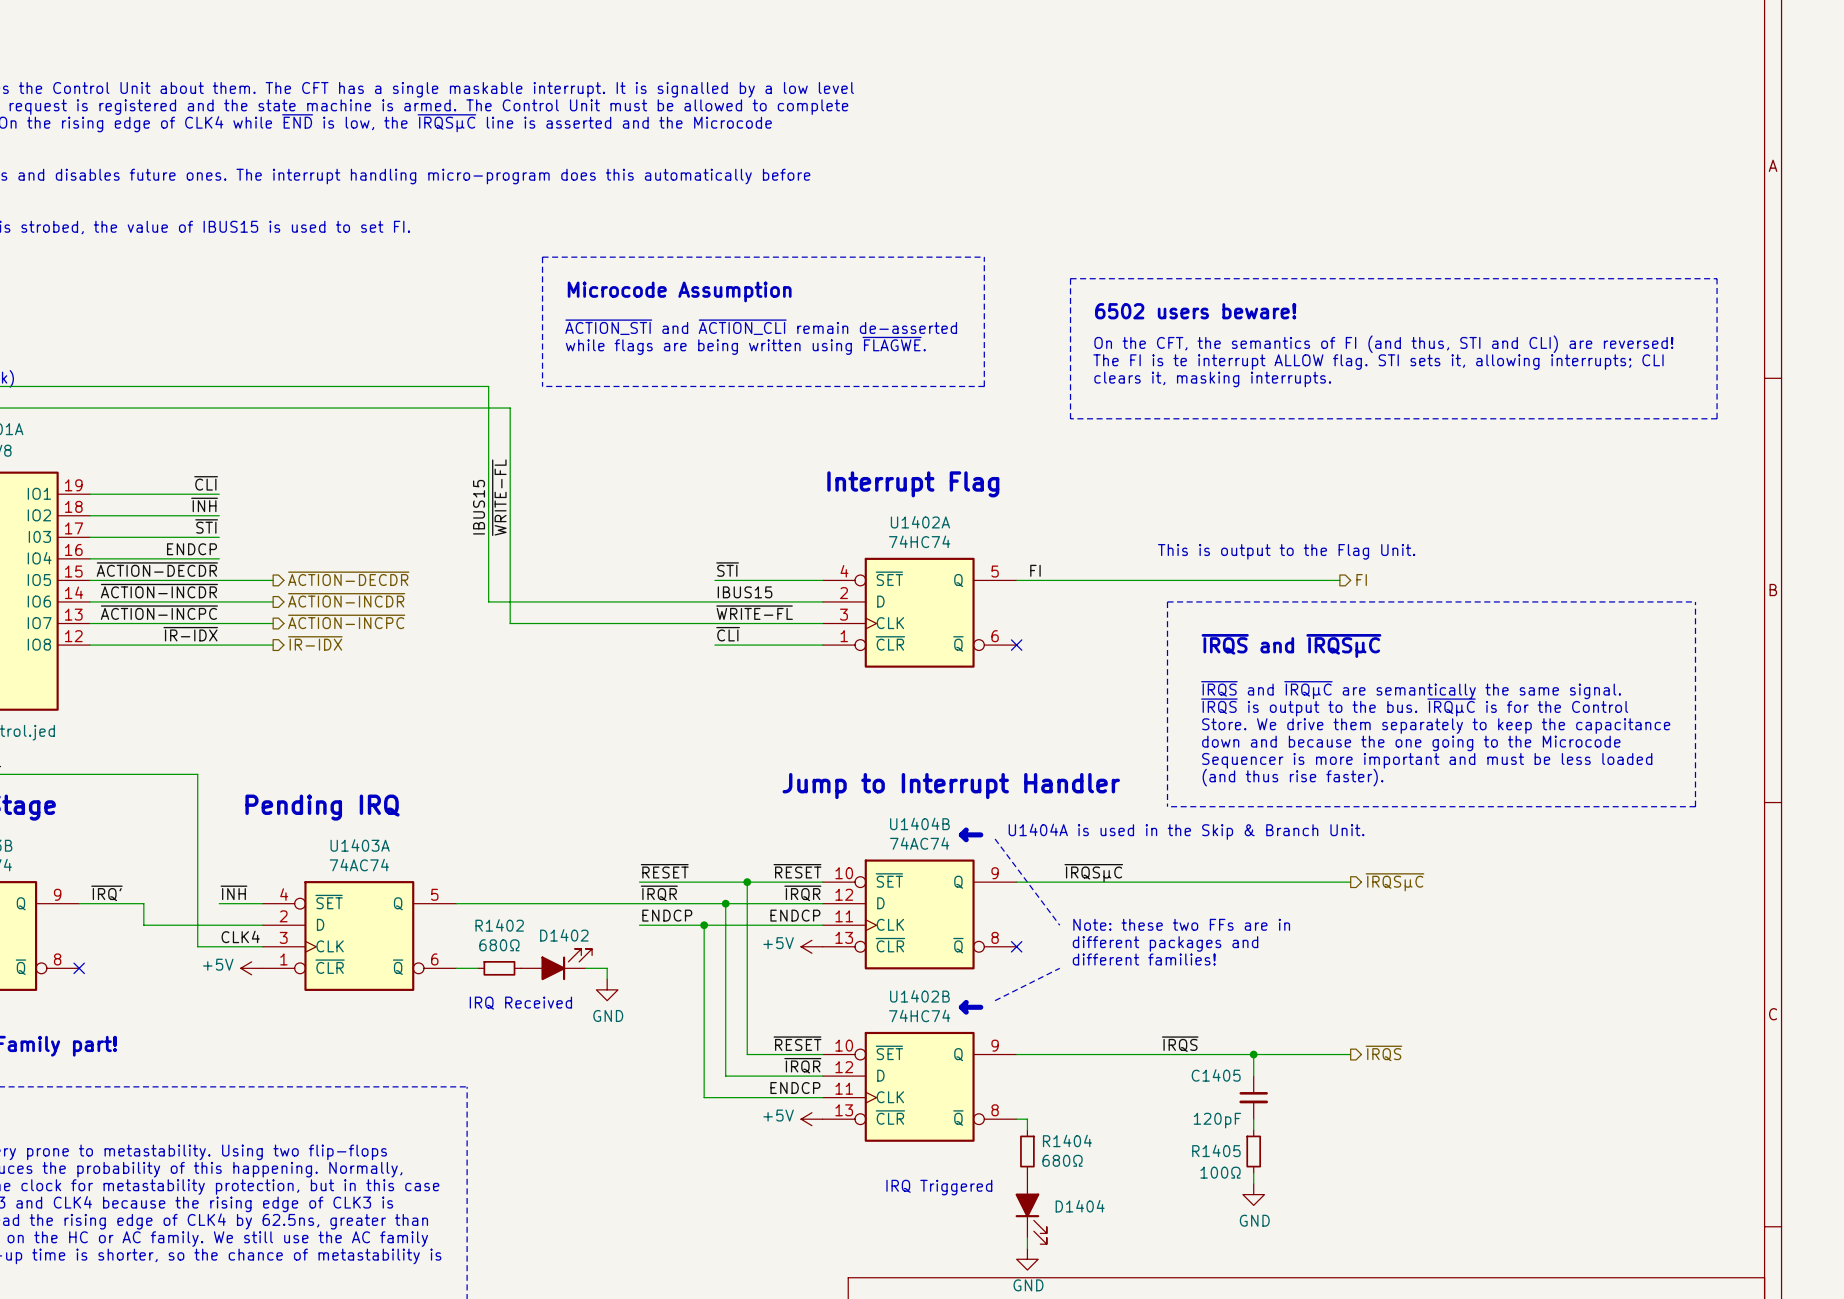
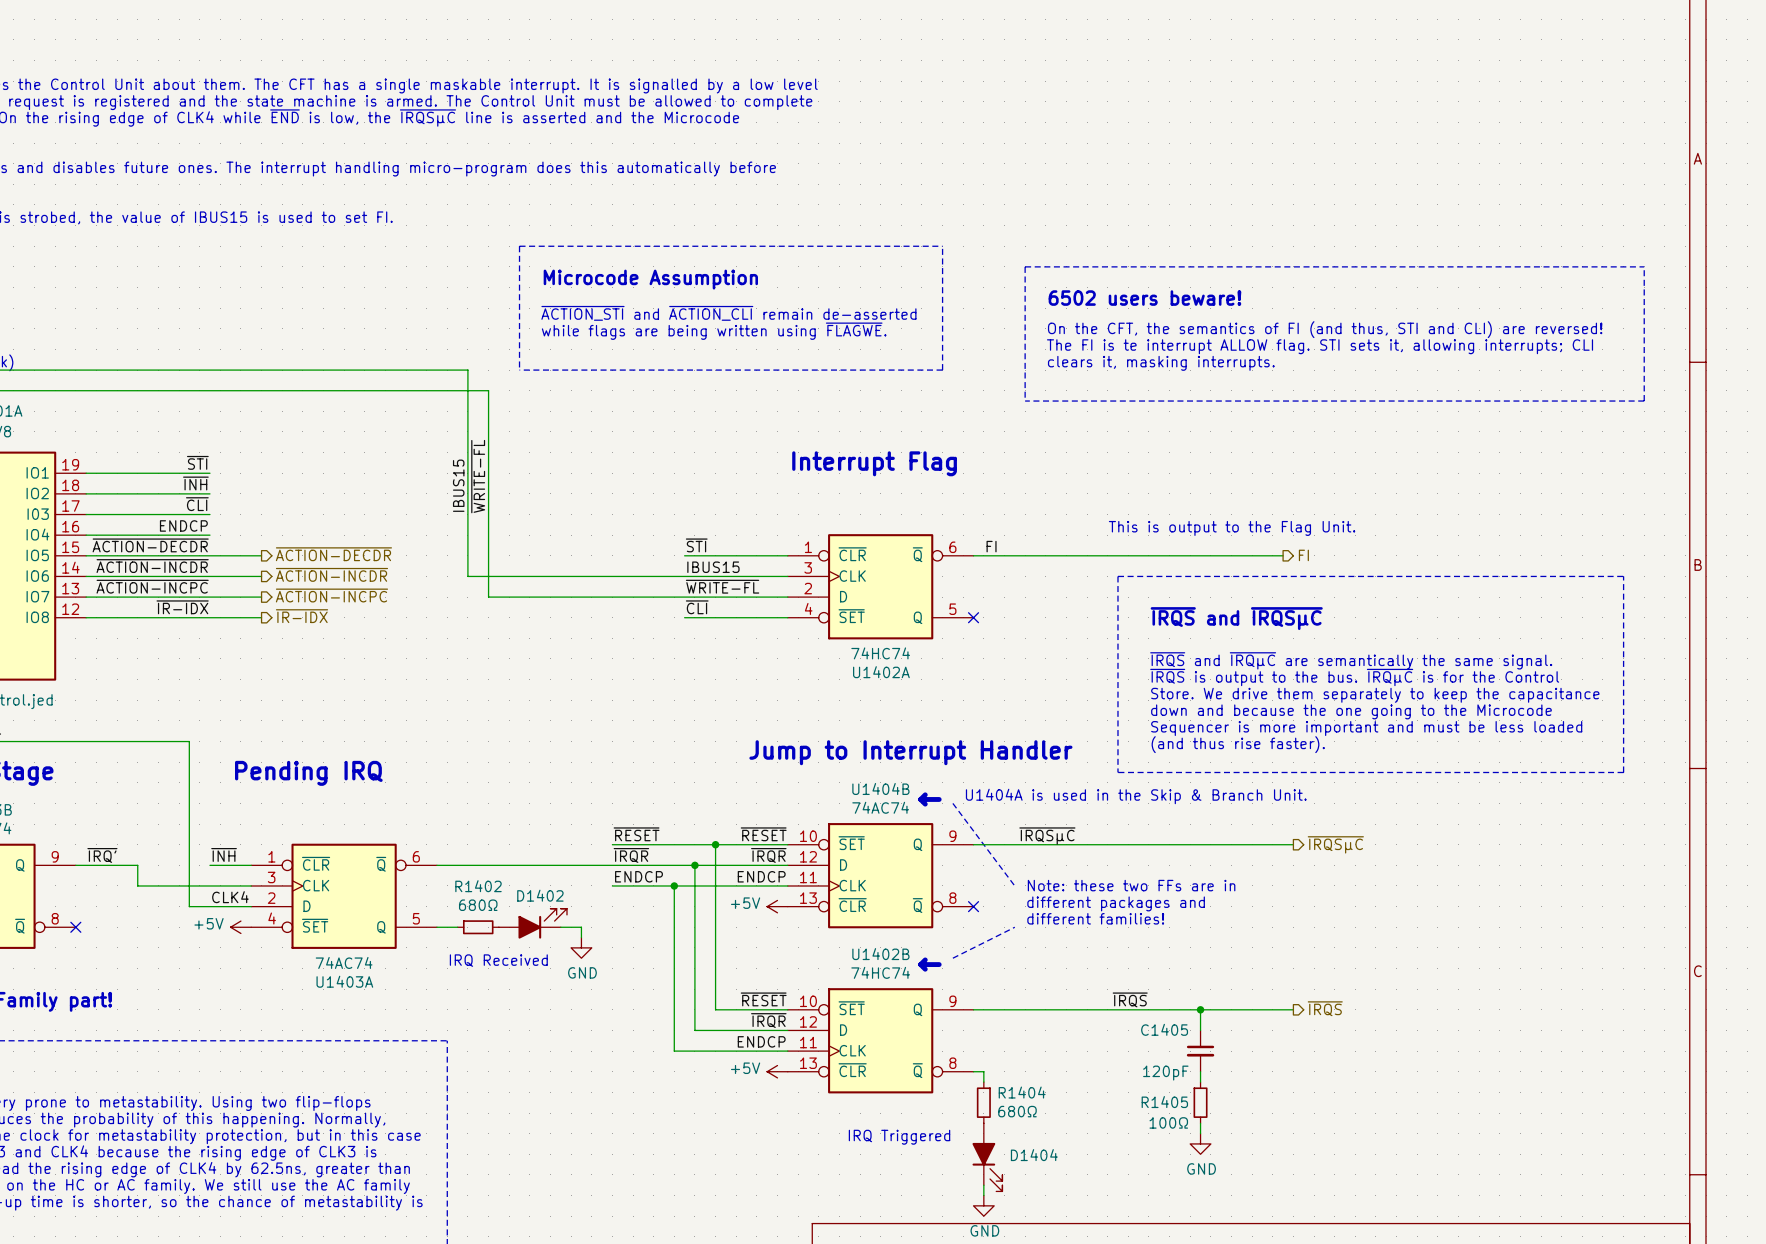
label: ~{CLI} (206, 483) -> ~{STI} (197, 462)
label: ~{STI} (206, 526) -> ~{CLI} (197, 504)
U1402A flip: as is (919, 612) -> up-down (880, 586)
U1403A flip: as is (359, 936) -> up-down (344, 896)

